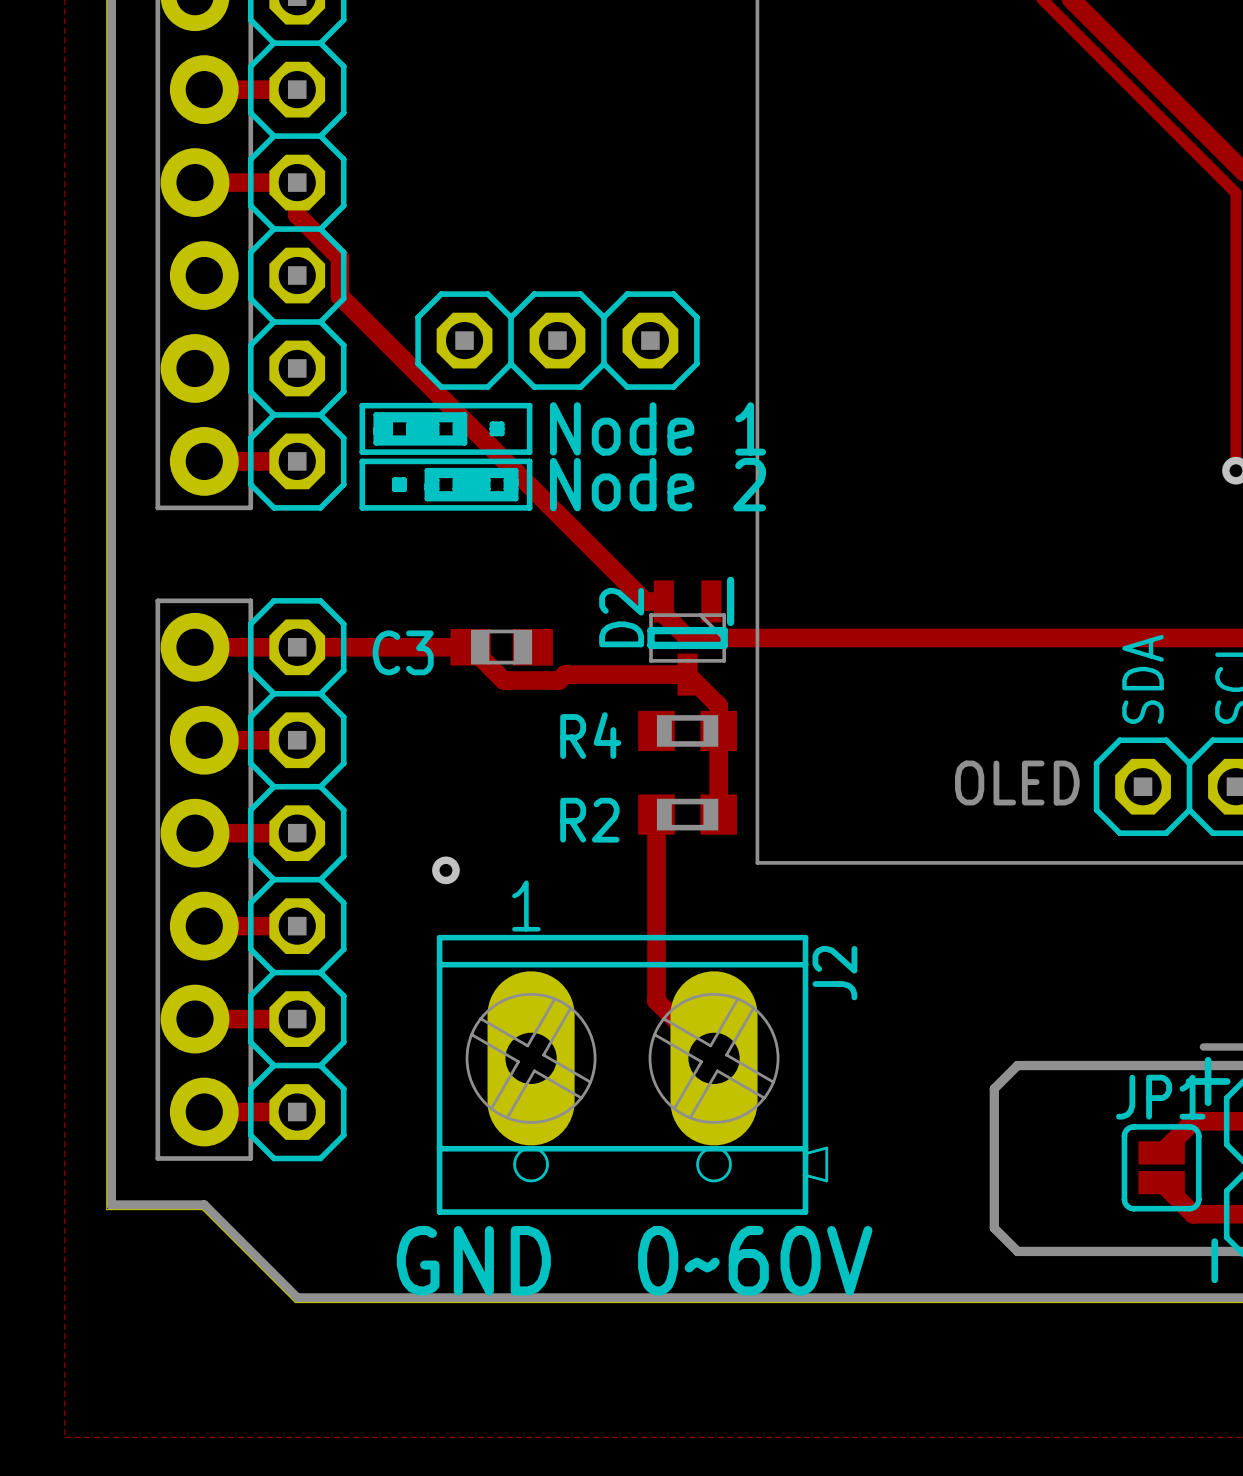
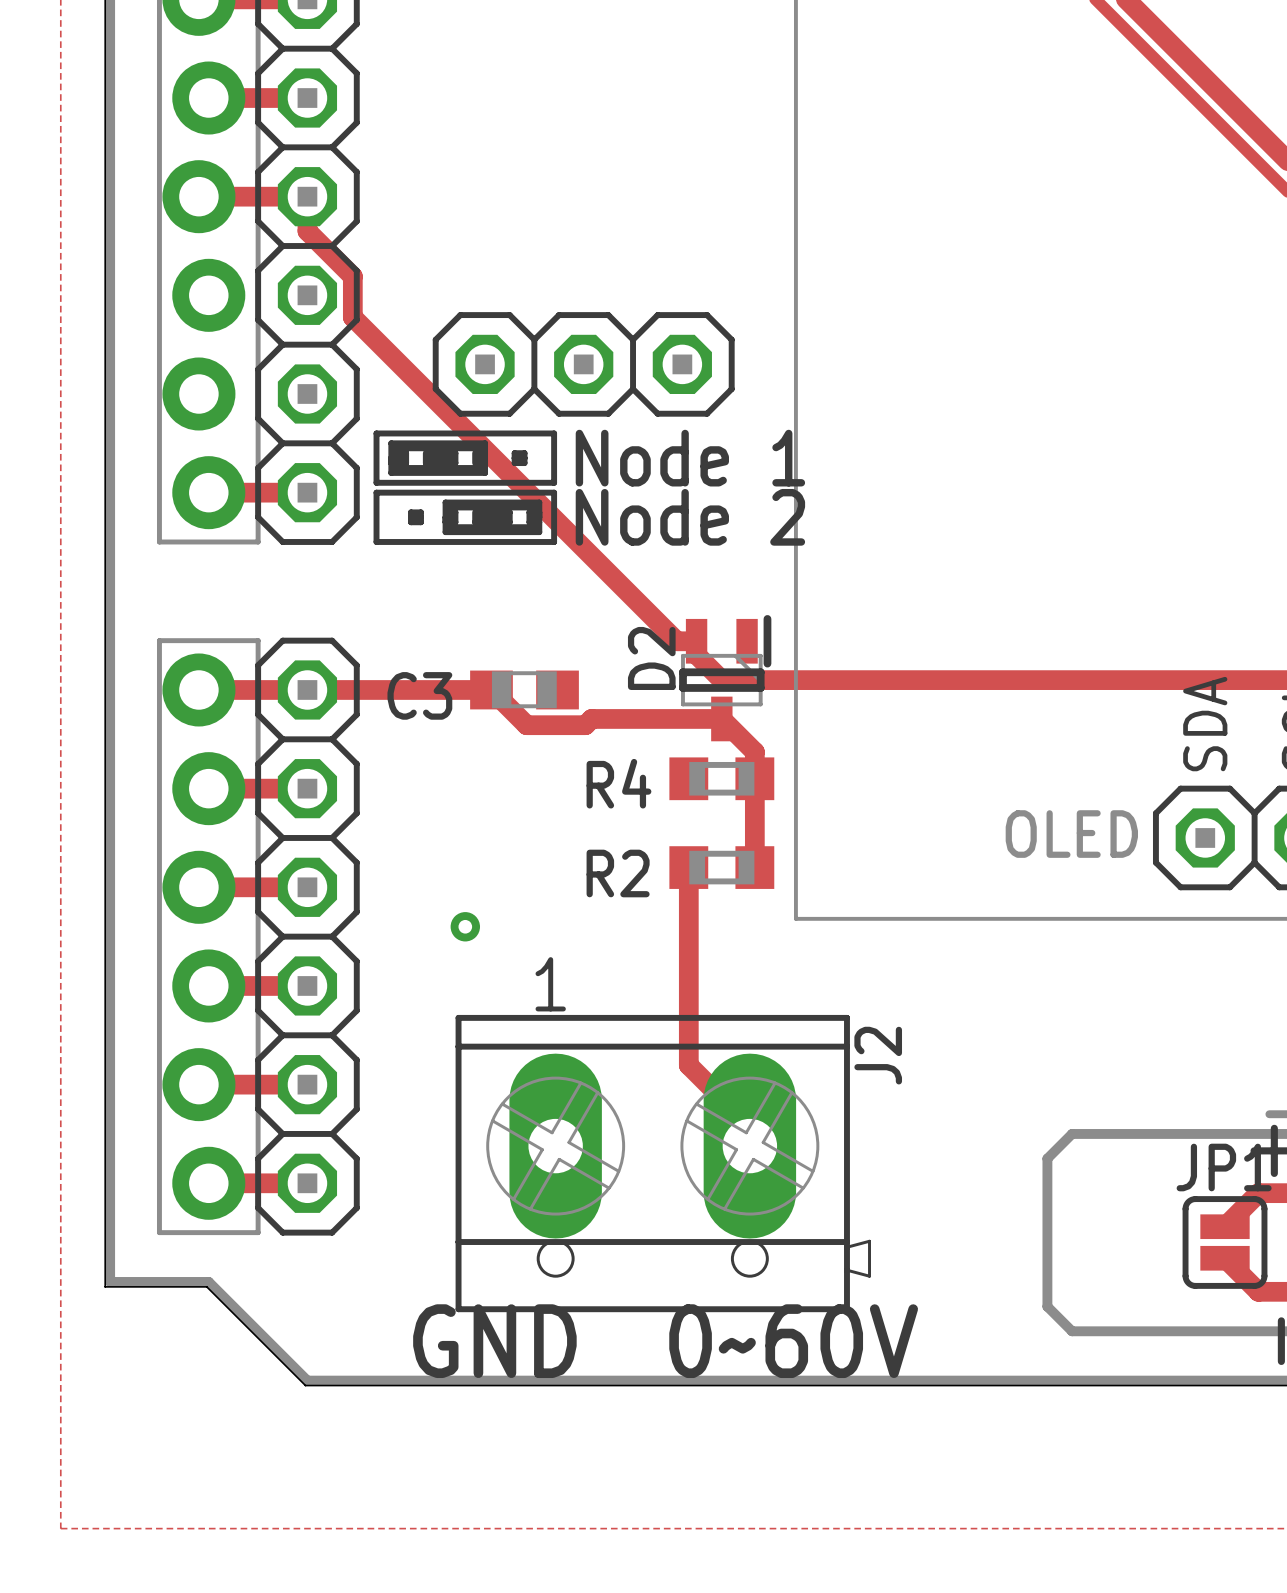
J2 position: (632, 1074) -> (663, 1163)

